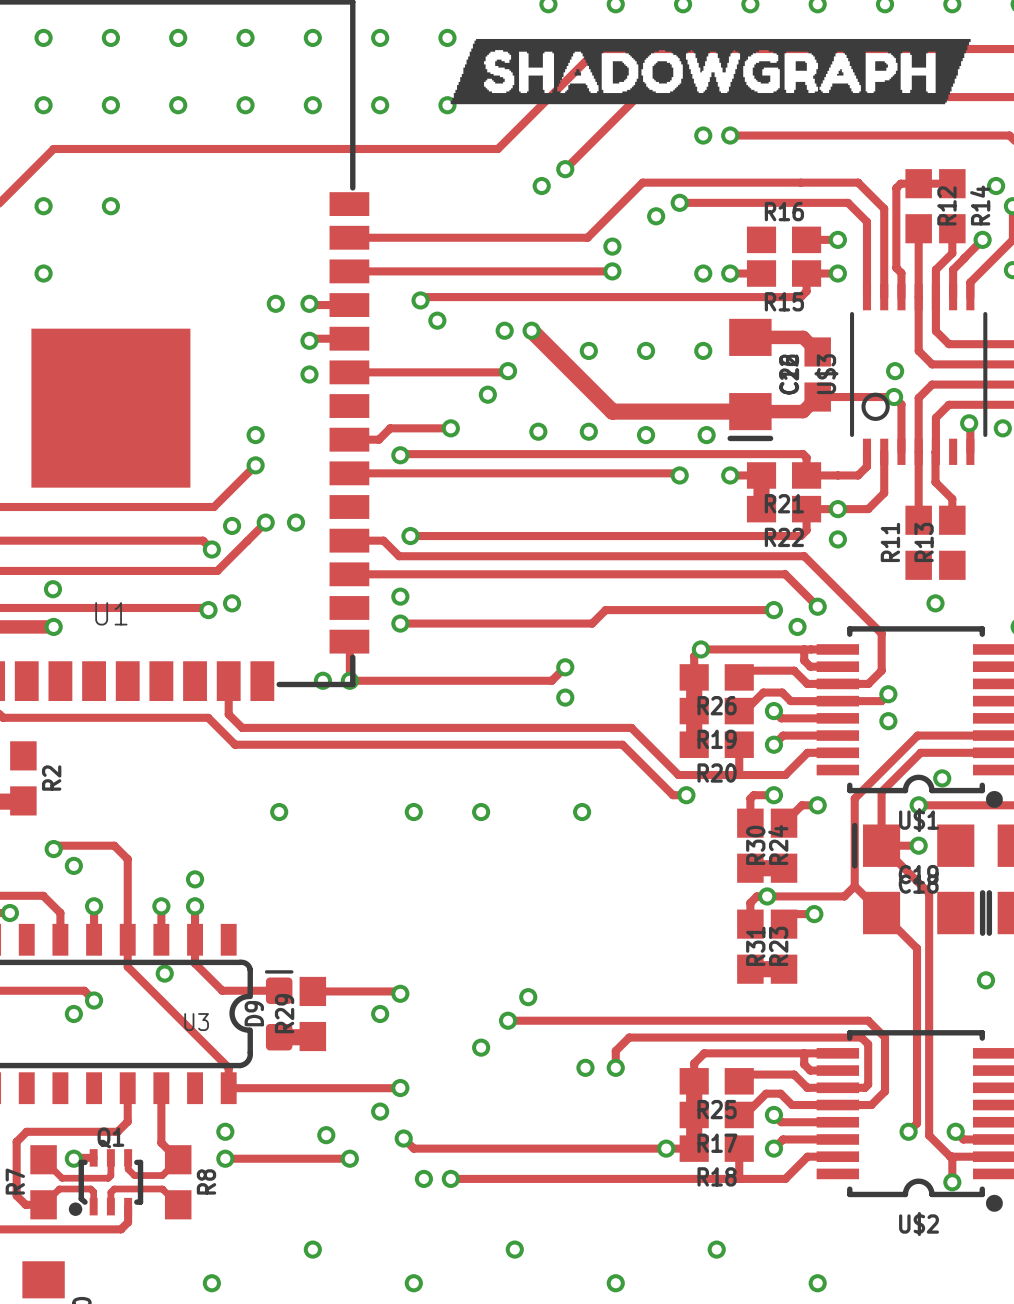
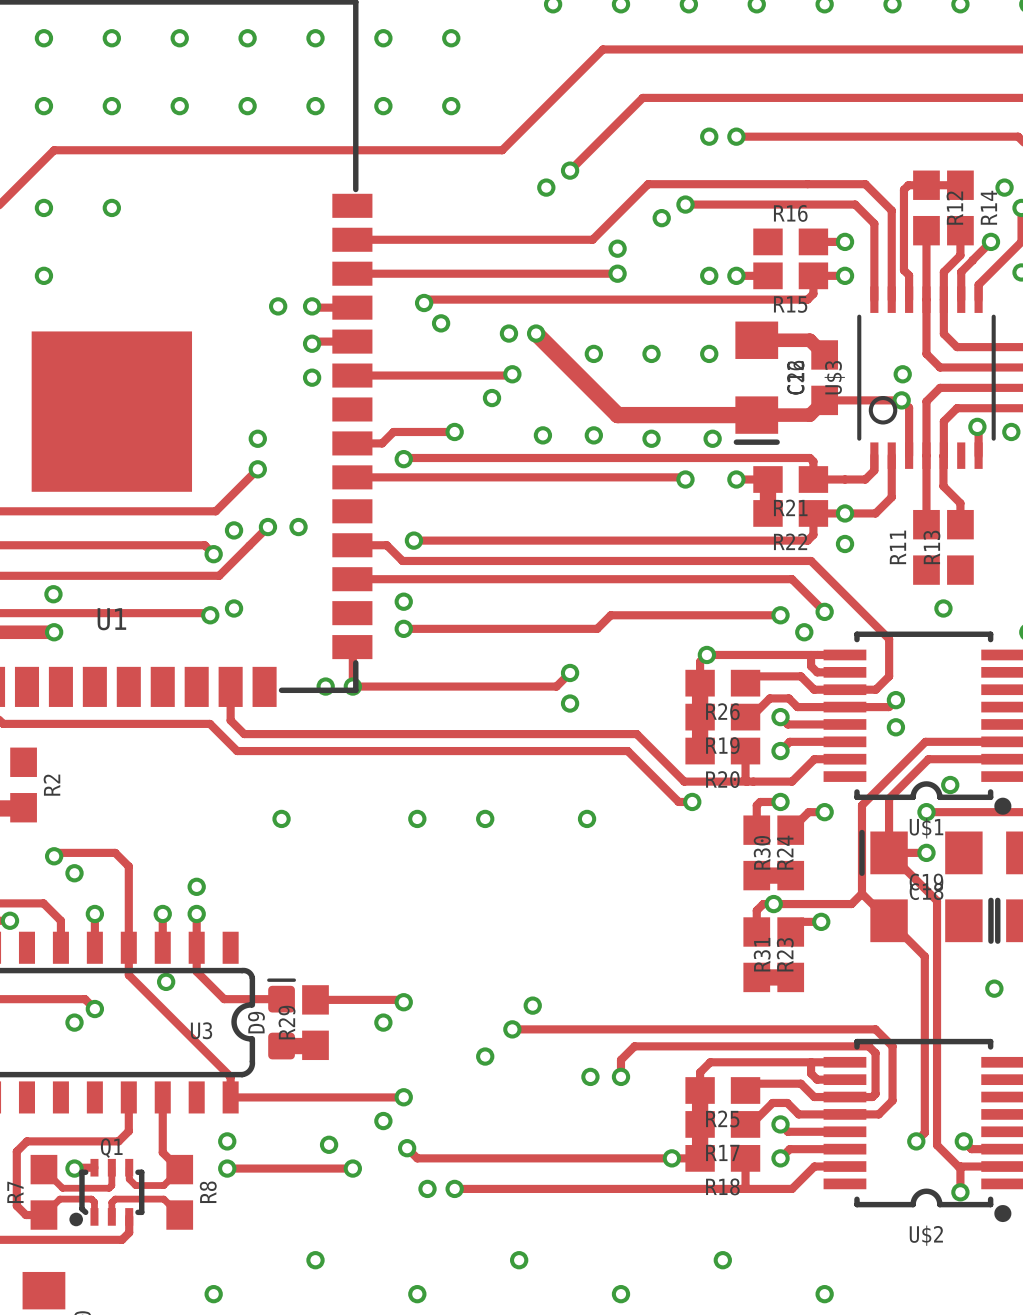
drawing: [450, 38, 971, 105] -> none

